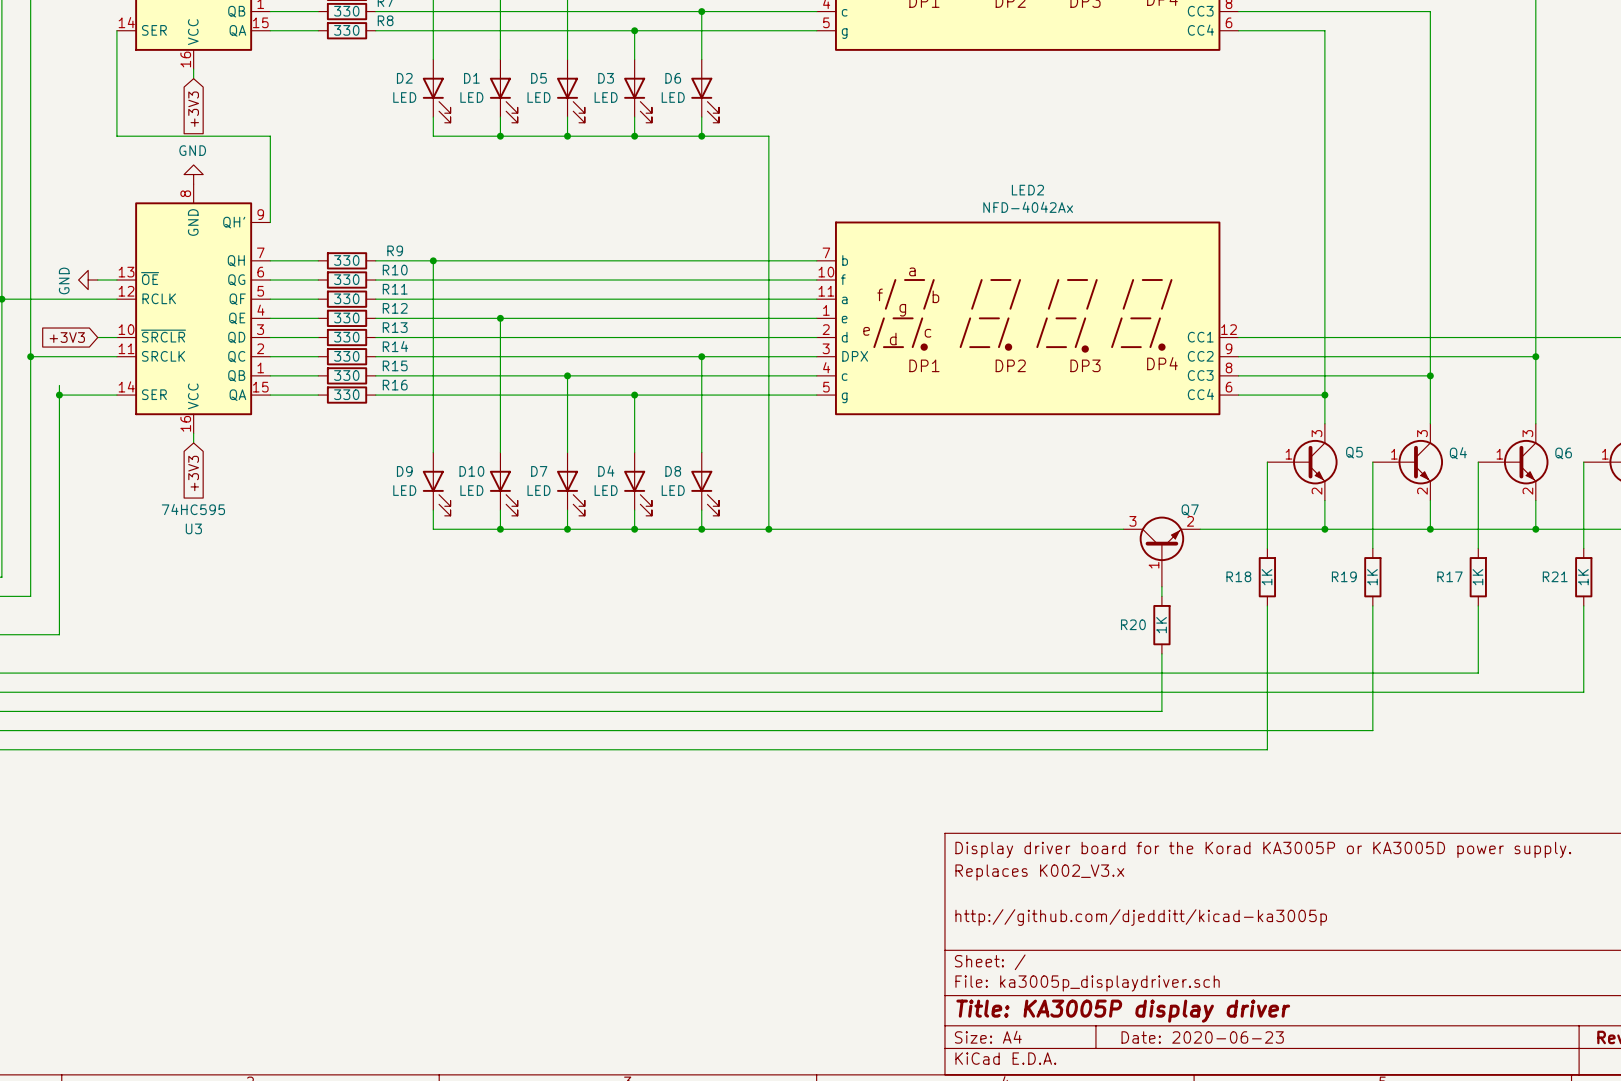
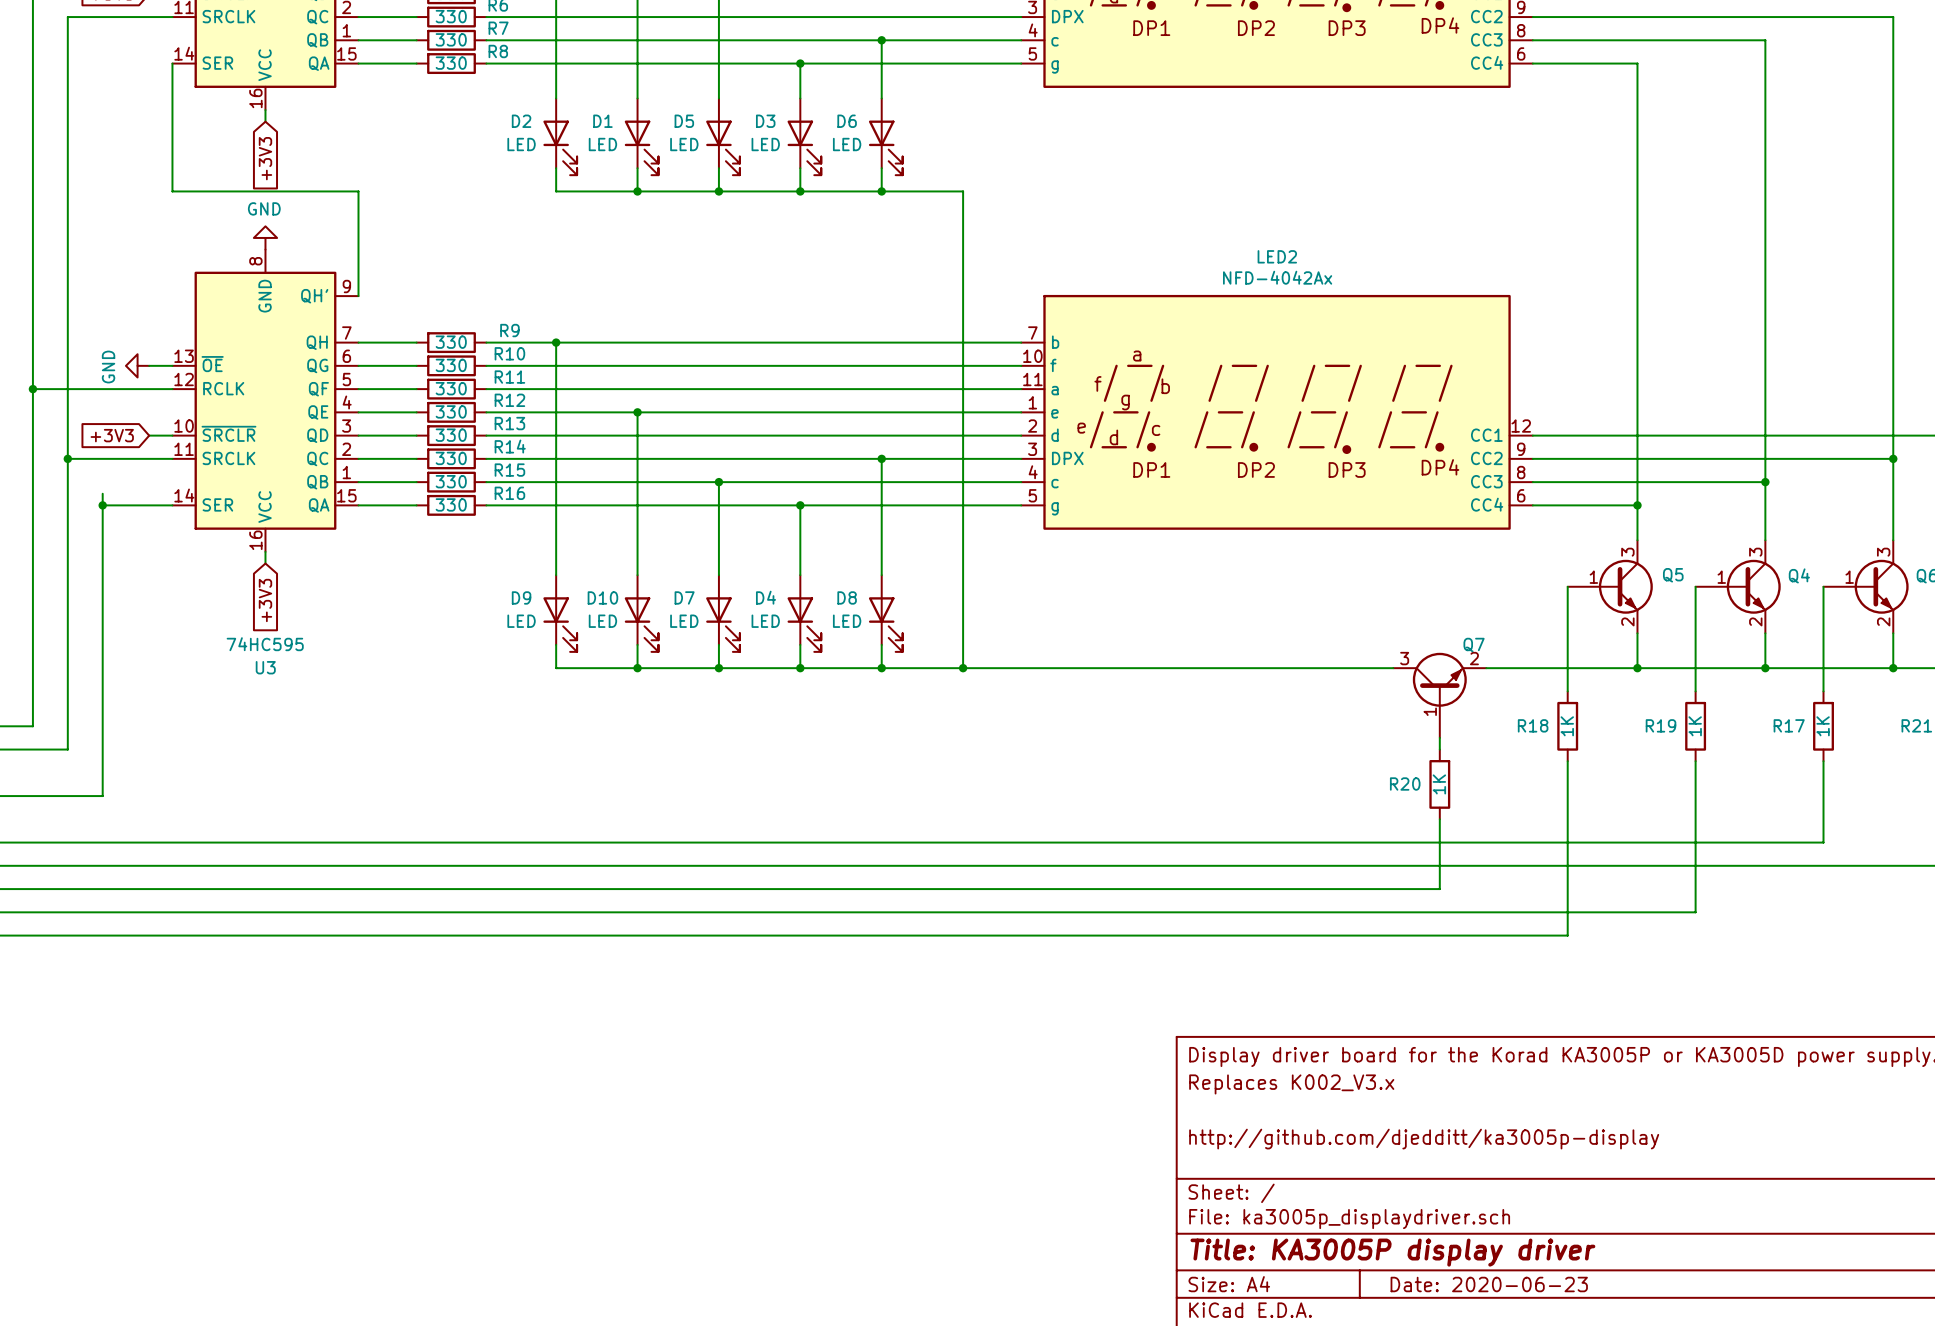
title block: http://github.com/djedditt/kicad-ka3005p (1141, 917) -> http://github.com/djedditt/ka3005p-display (1424, 1139)

